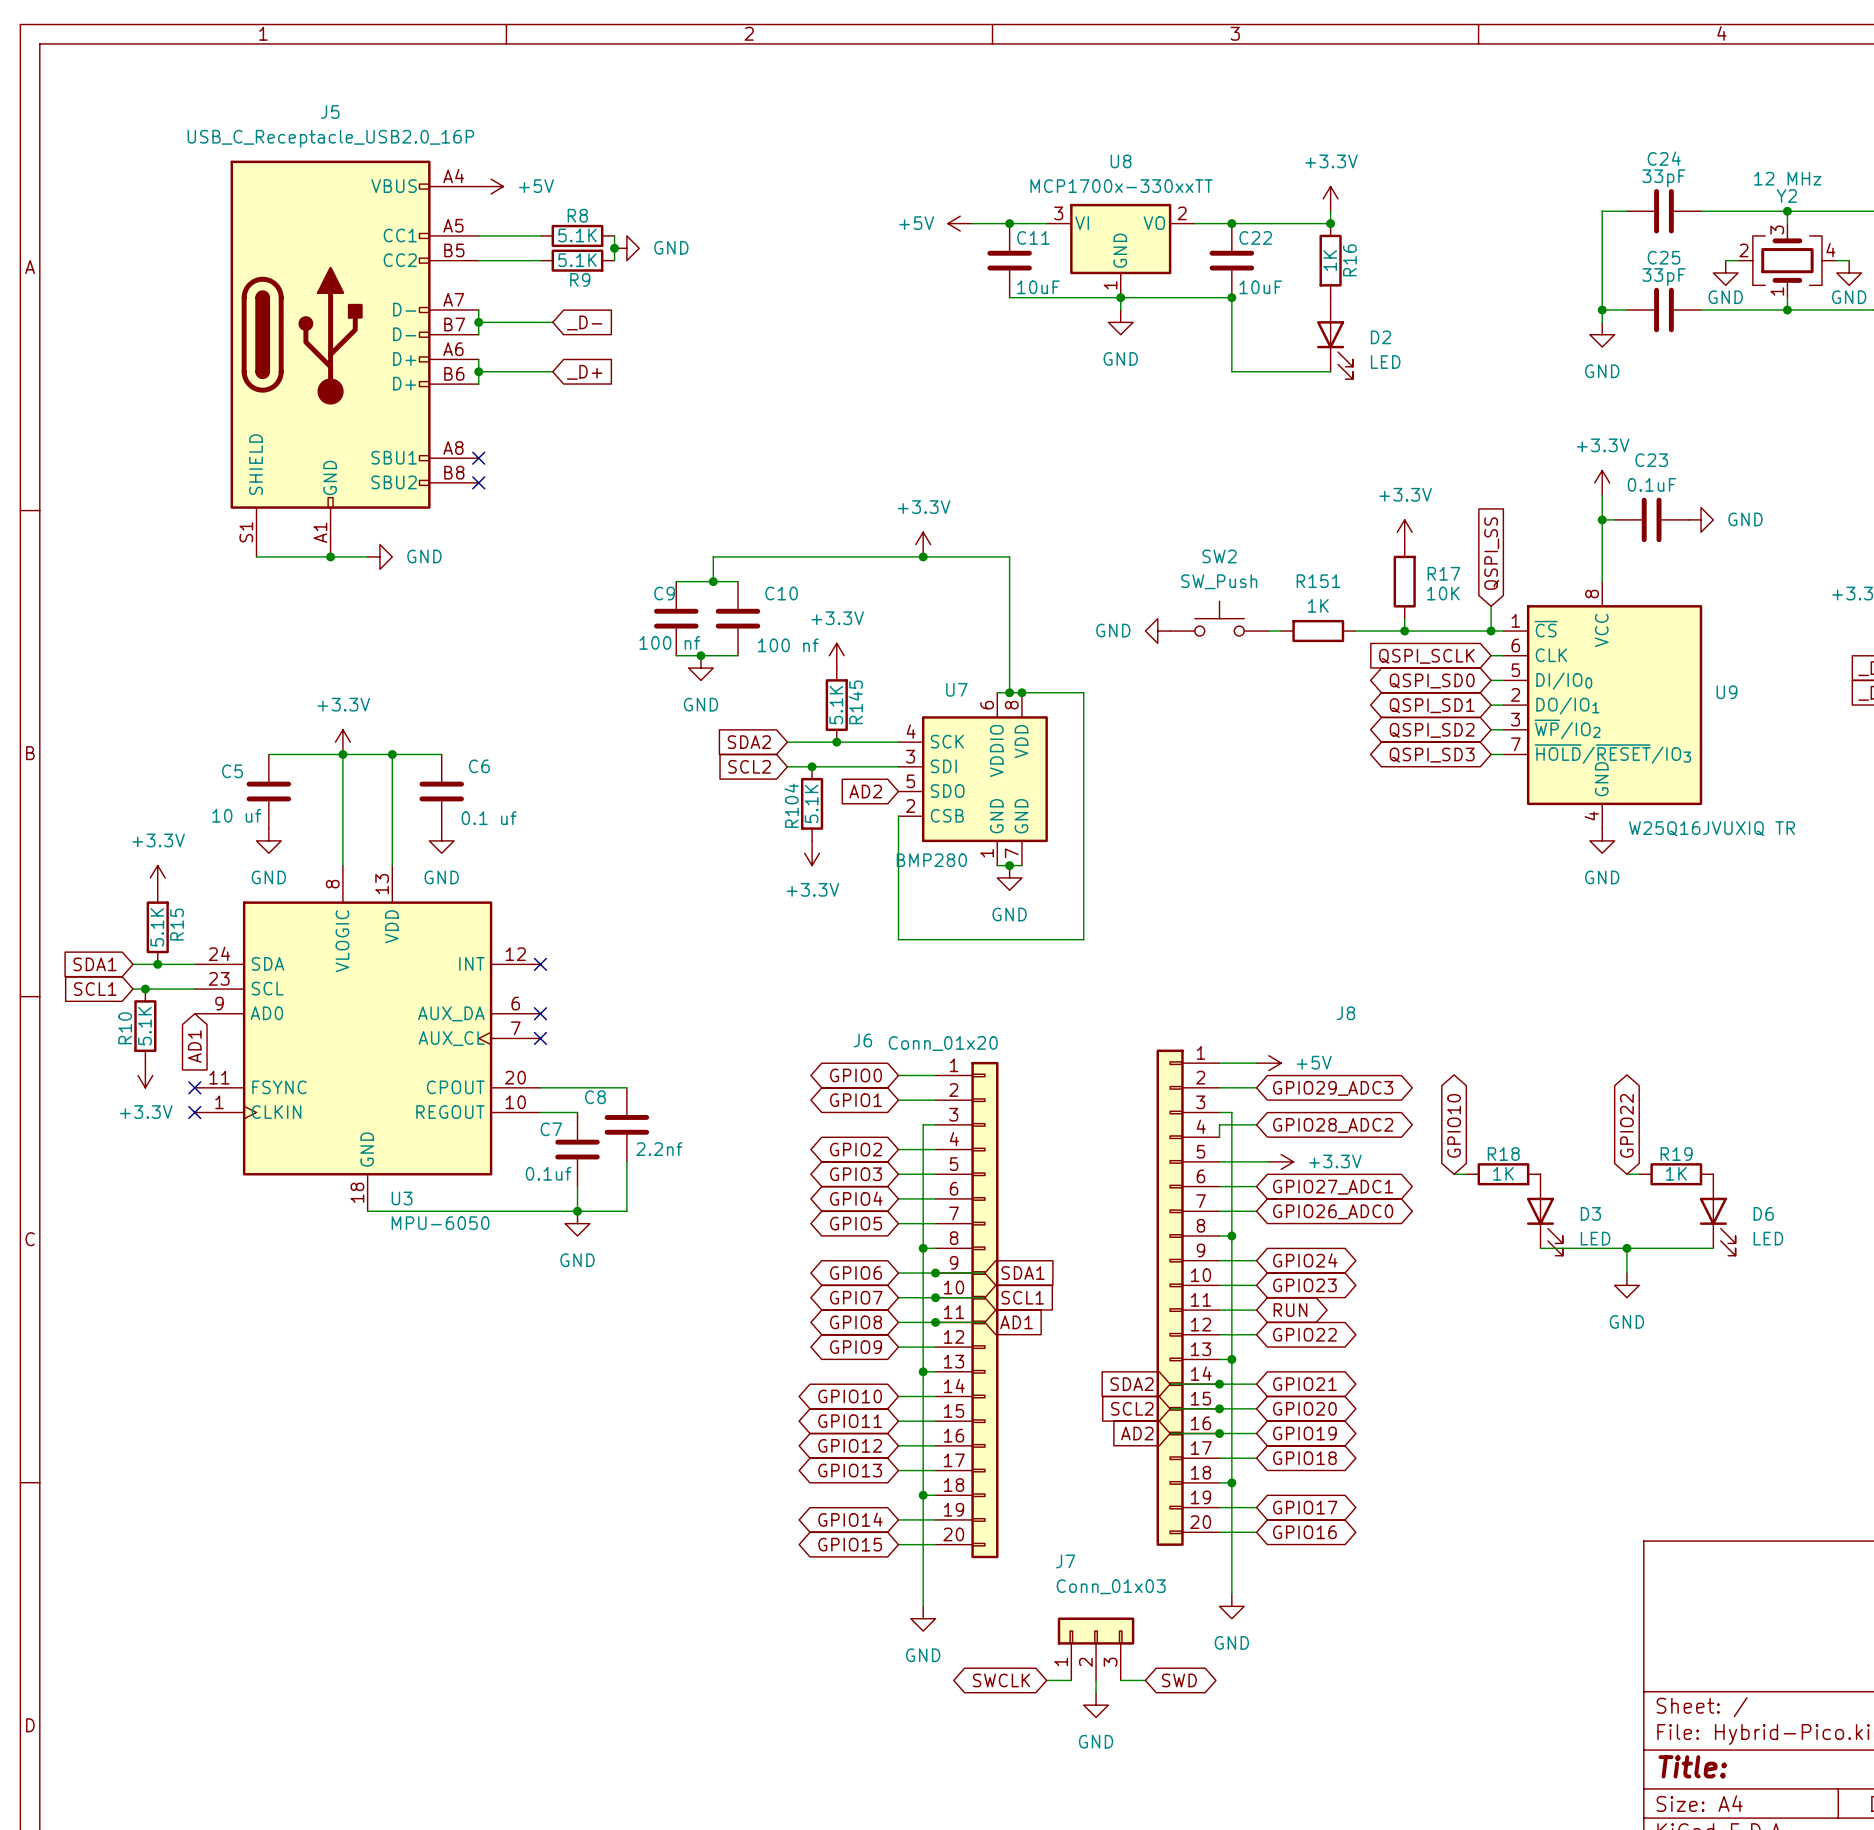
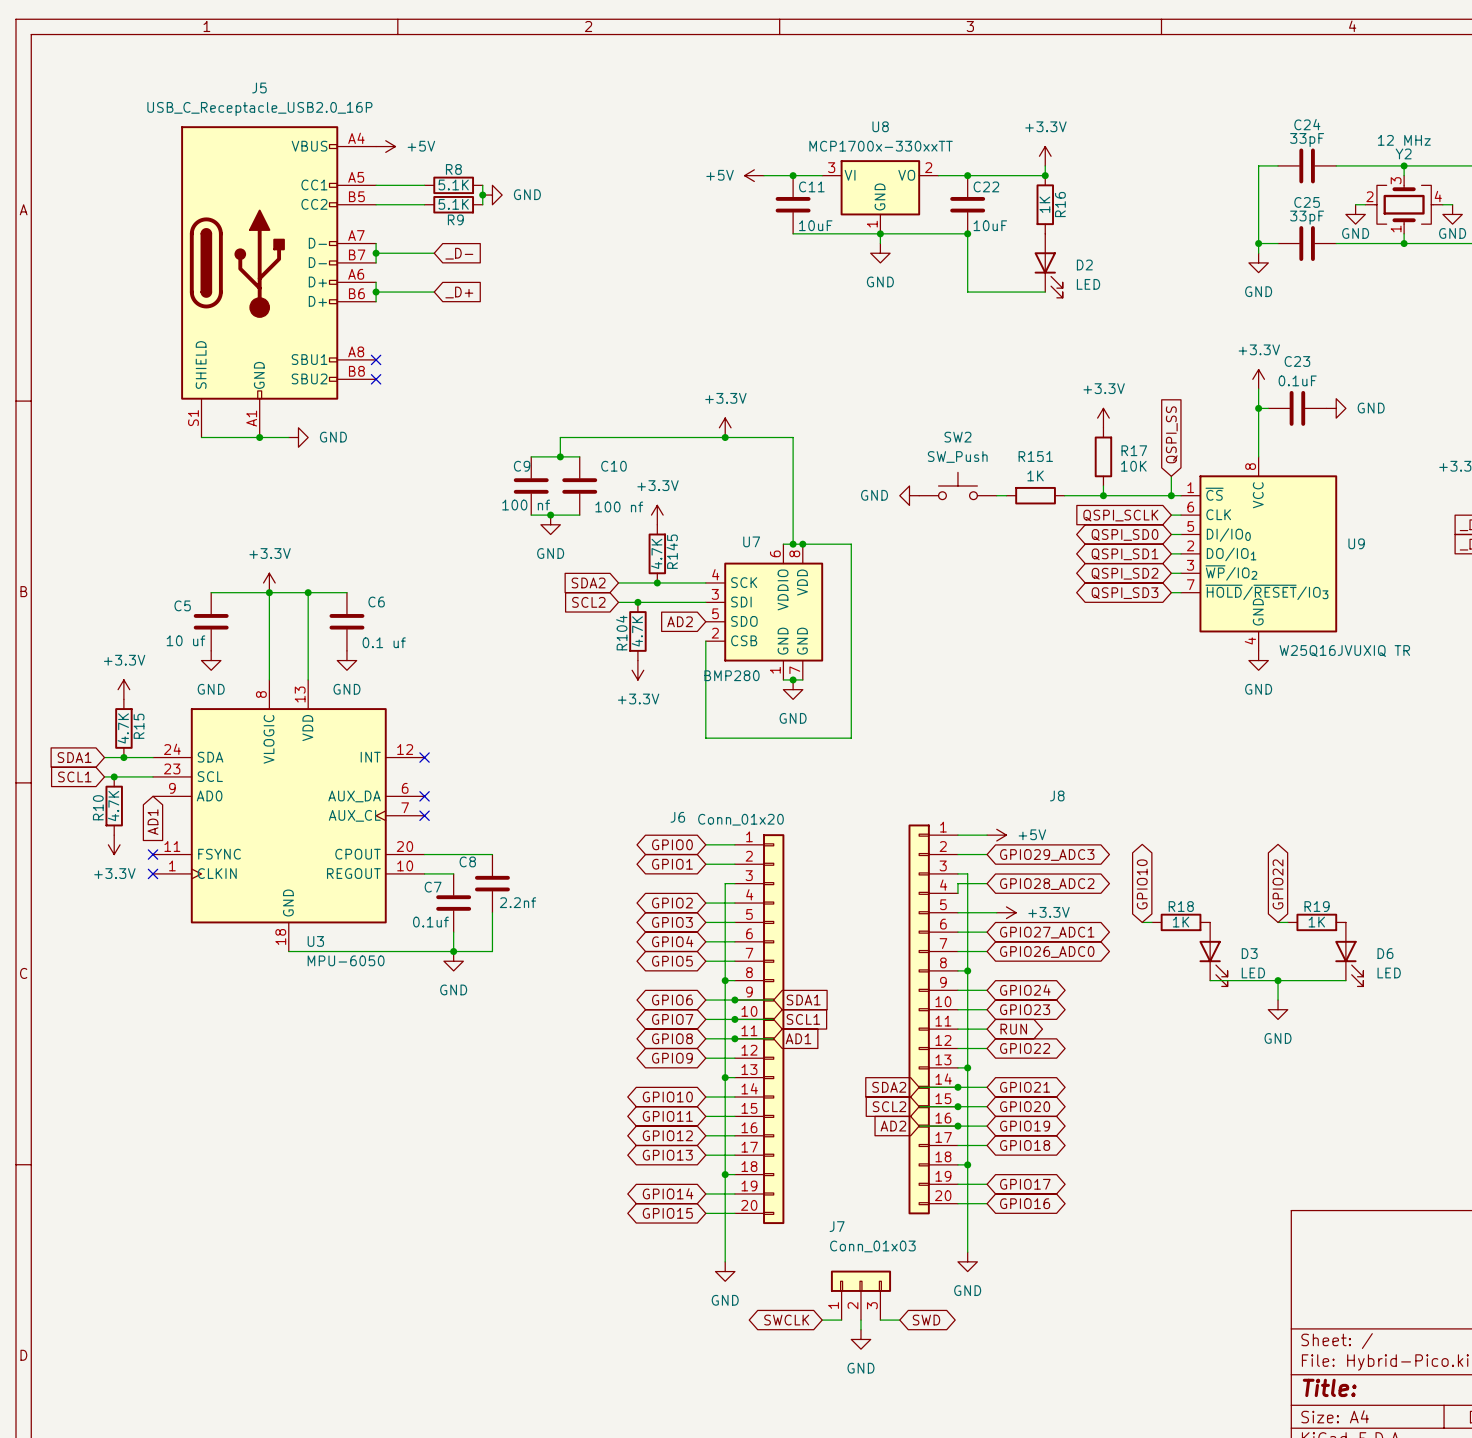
R145 value: 5.1K (836, 705) -> 4.7K (656, 553)
R104 value: 5.1K (811, 803) -> 4.7K (637, 631)
R15 value: 5.1K (157, 927) -> 4.7K (123, 728)
R10 value: 5.1K (144, 1026) -> 4.7K (113, 806)

